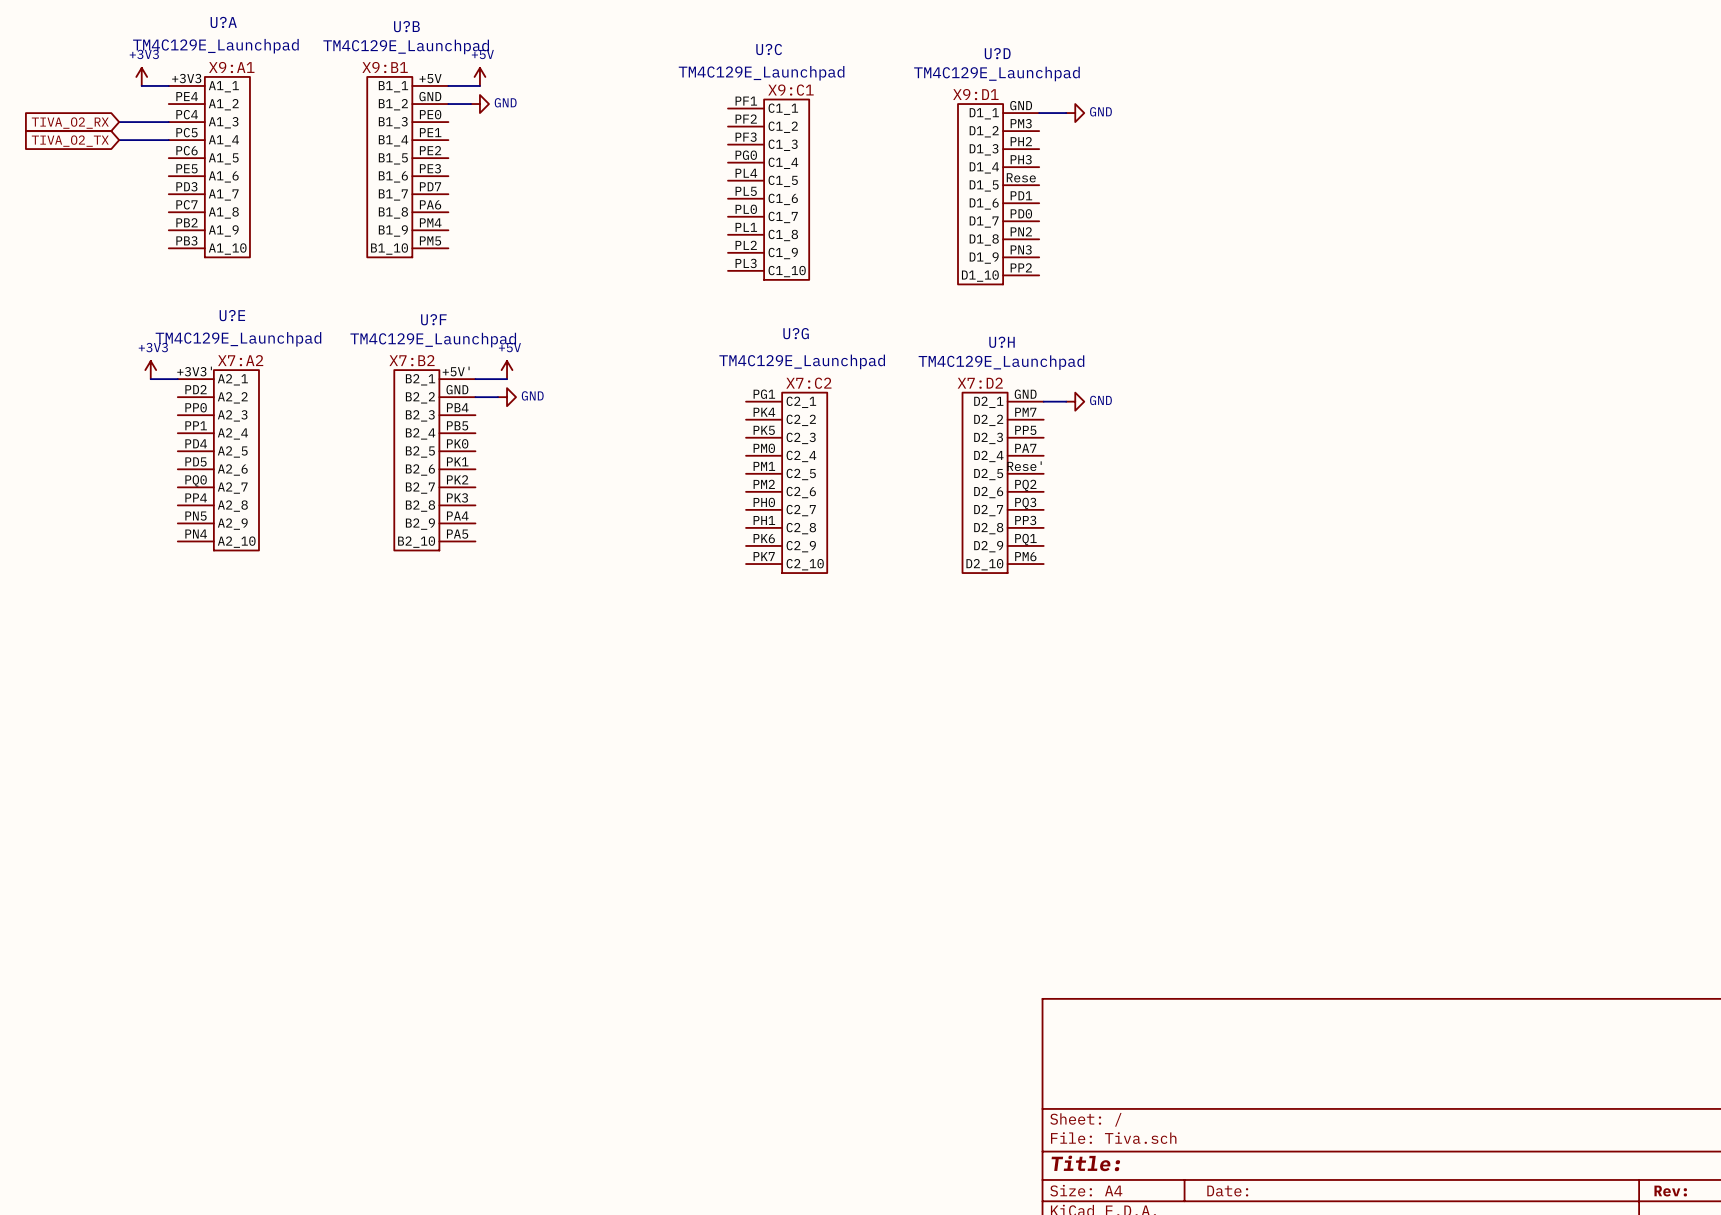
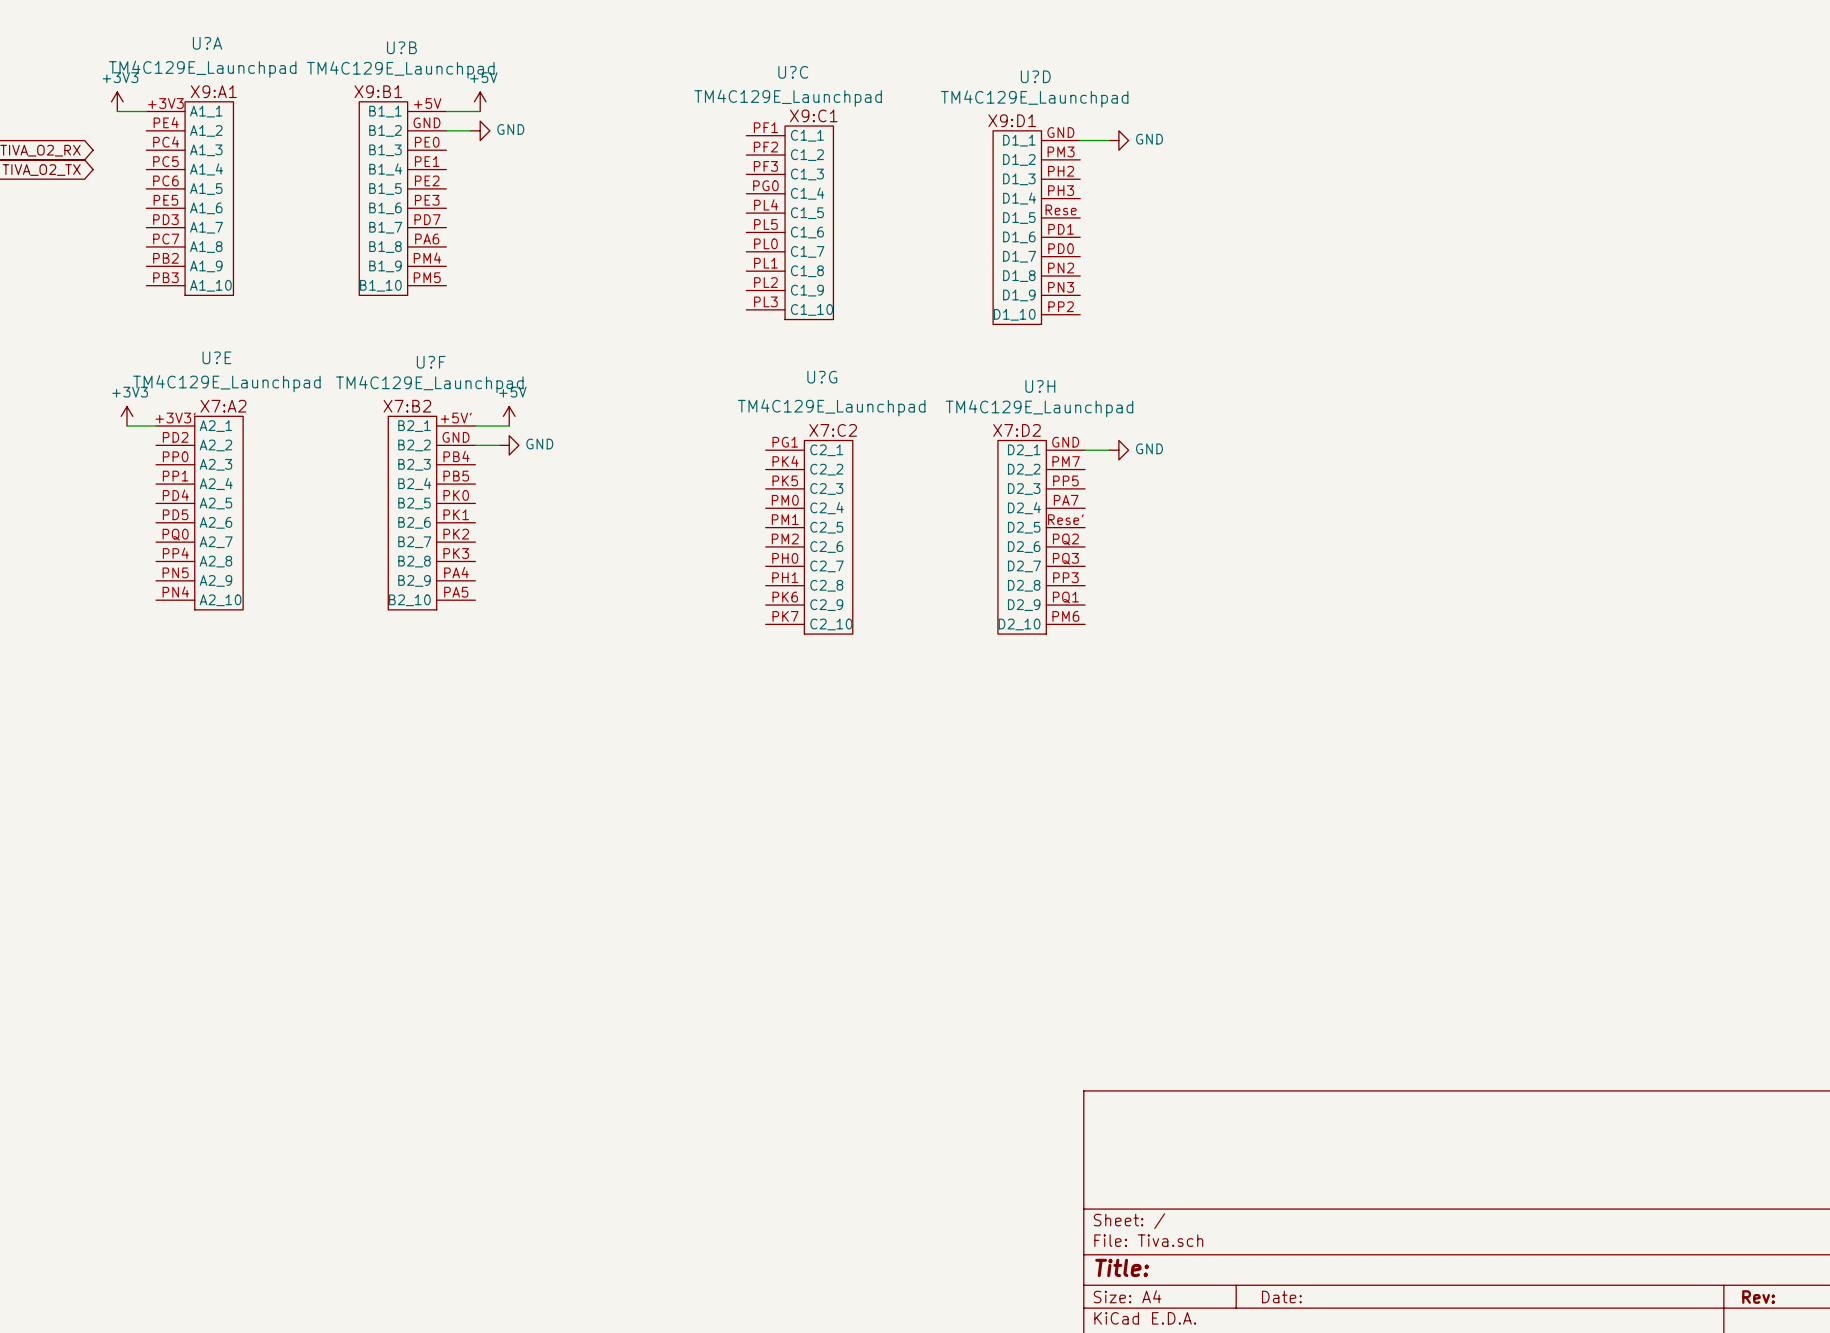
wire: (119, 122) (168, 122) -> none
wire: (119, 140) (168, 140) -> none

